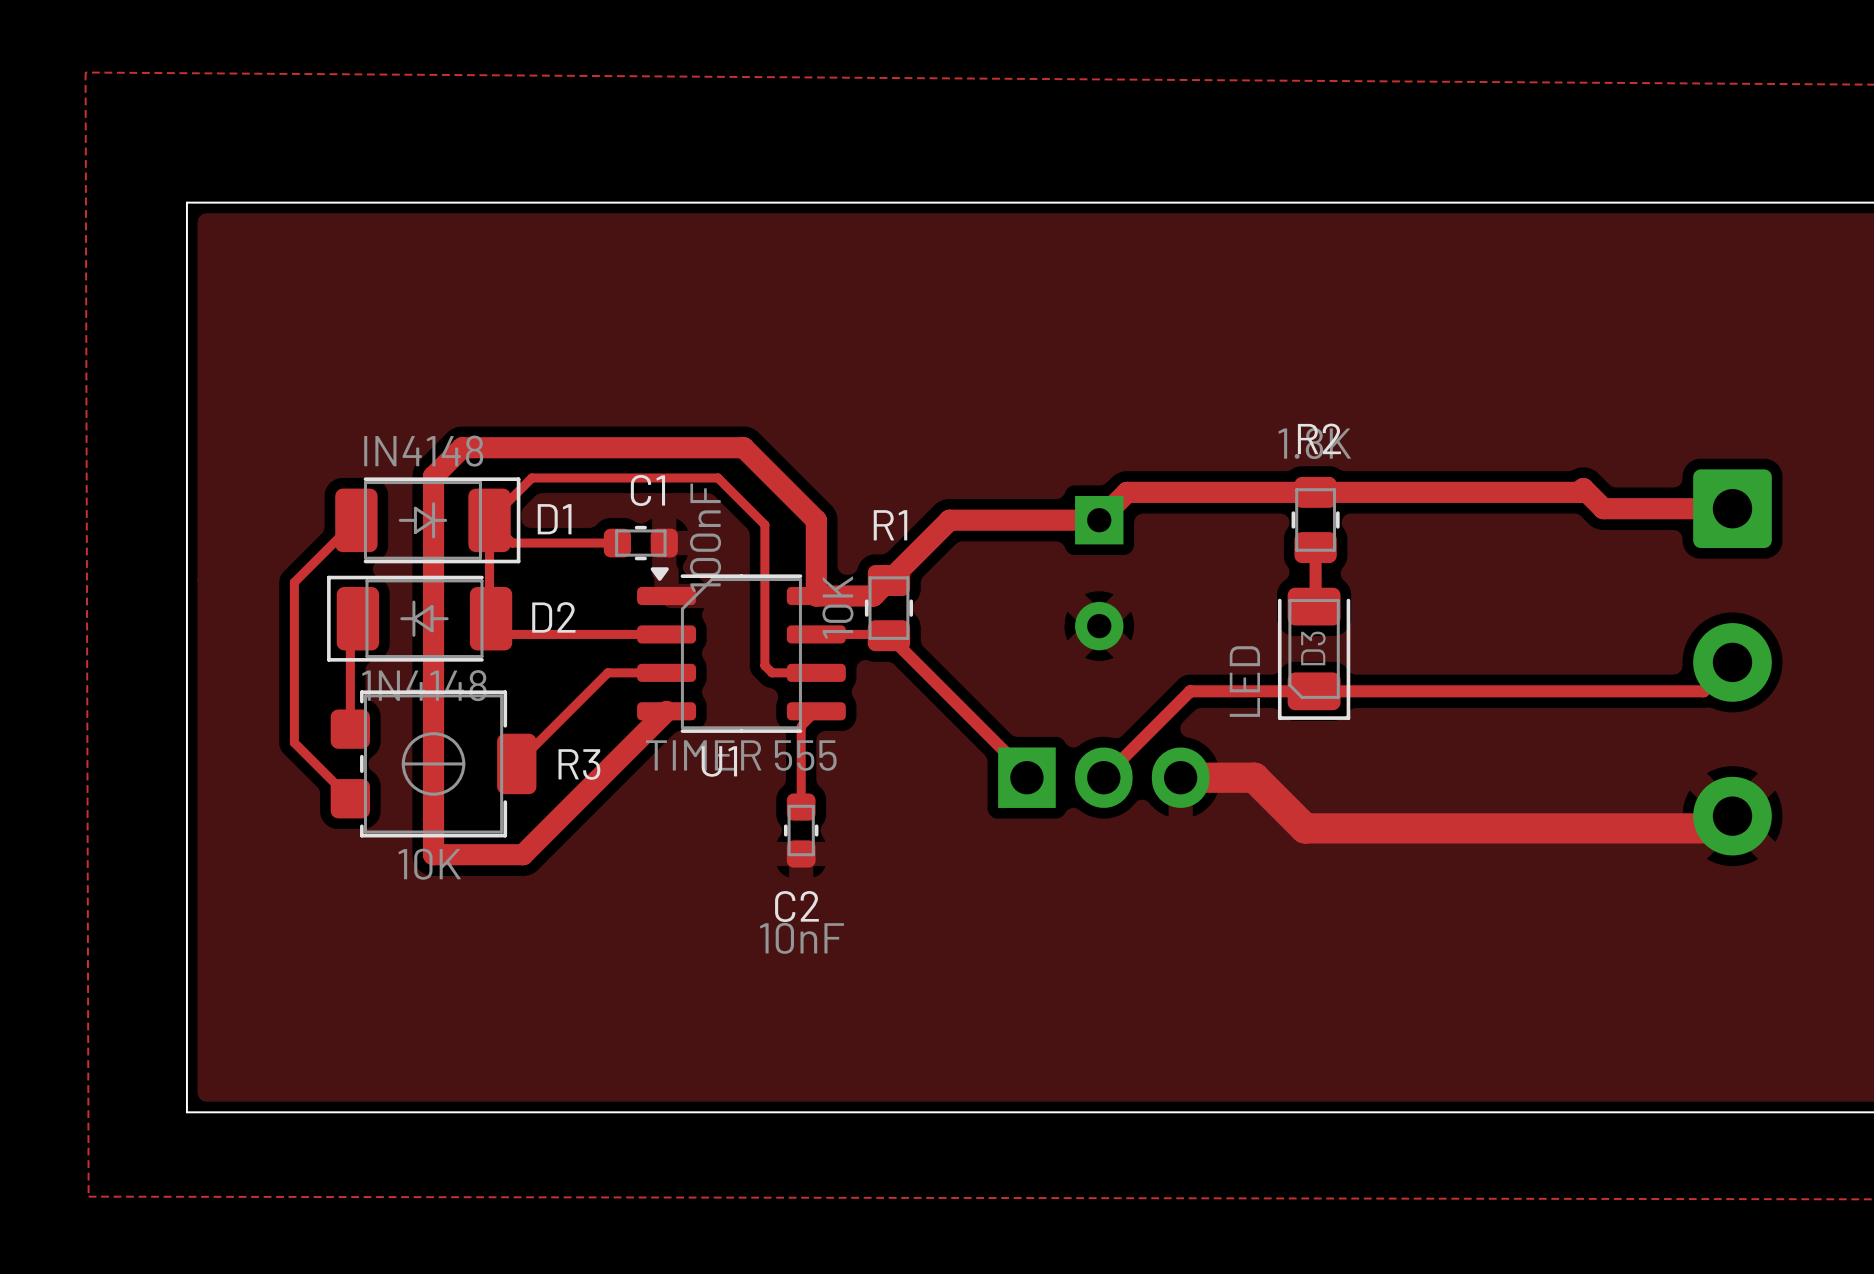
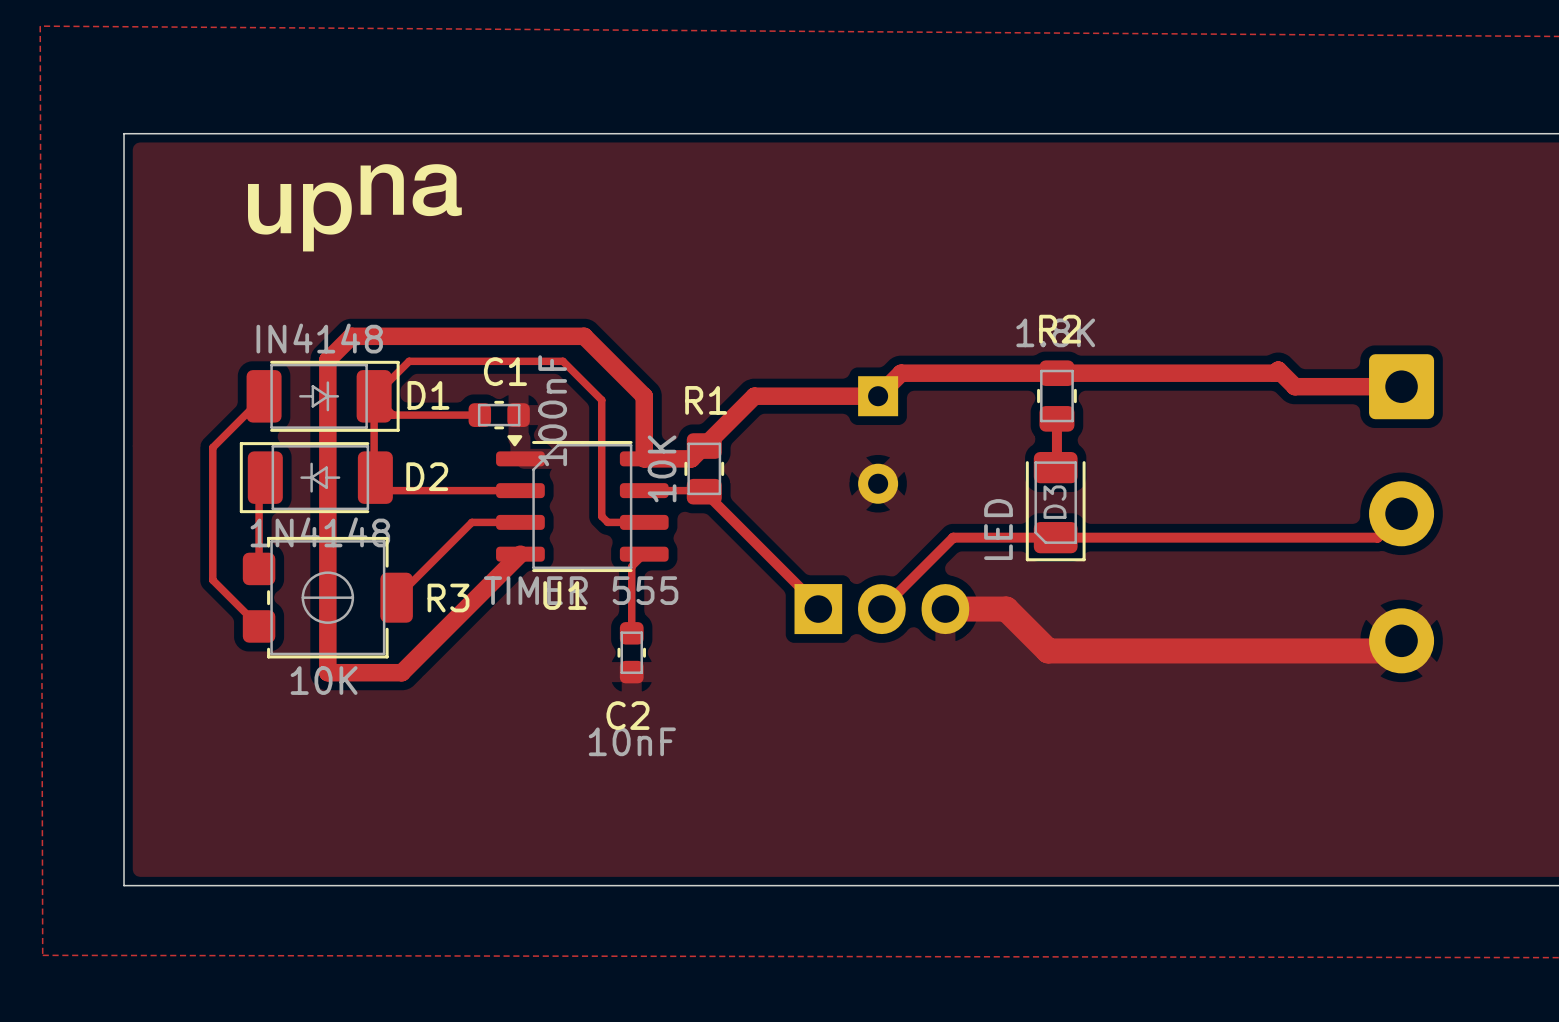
drawing: none -> [248, 164, 462, 252]

